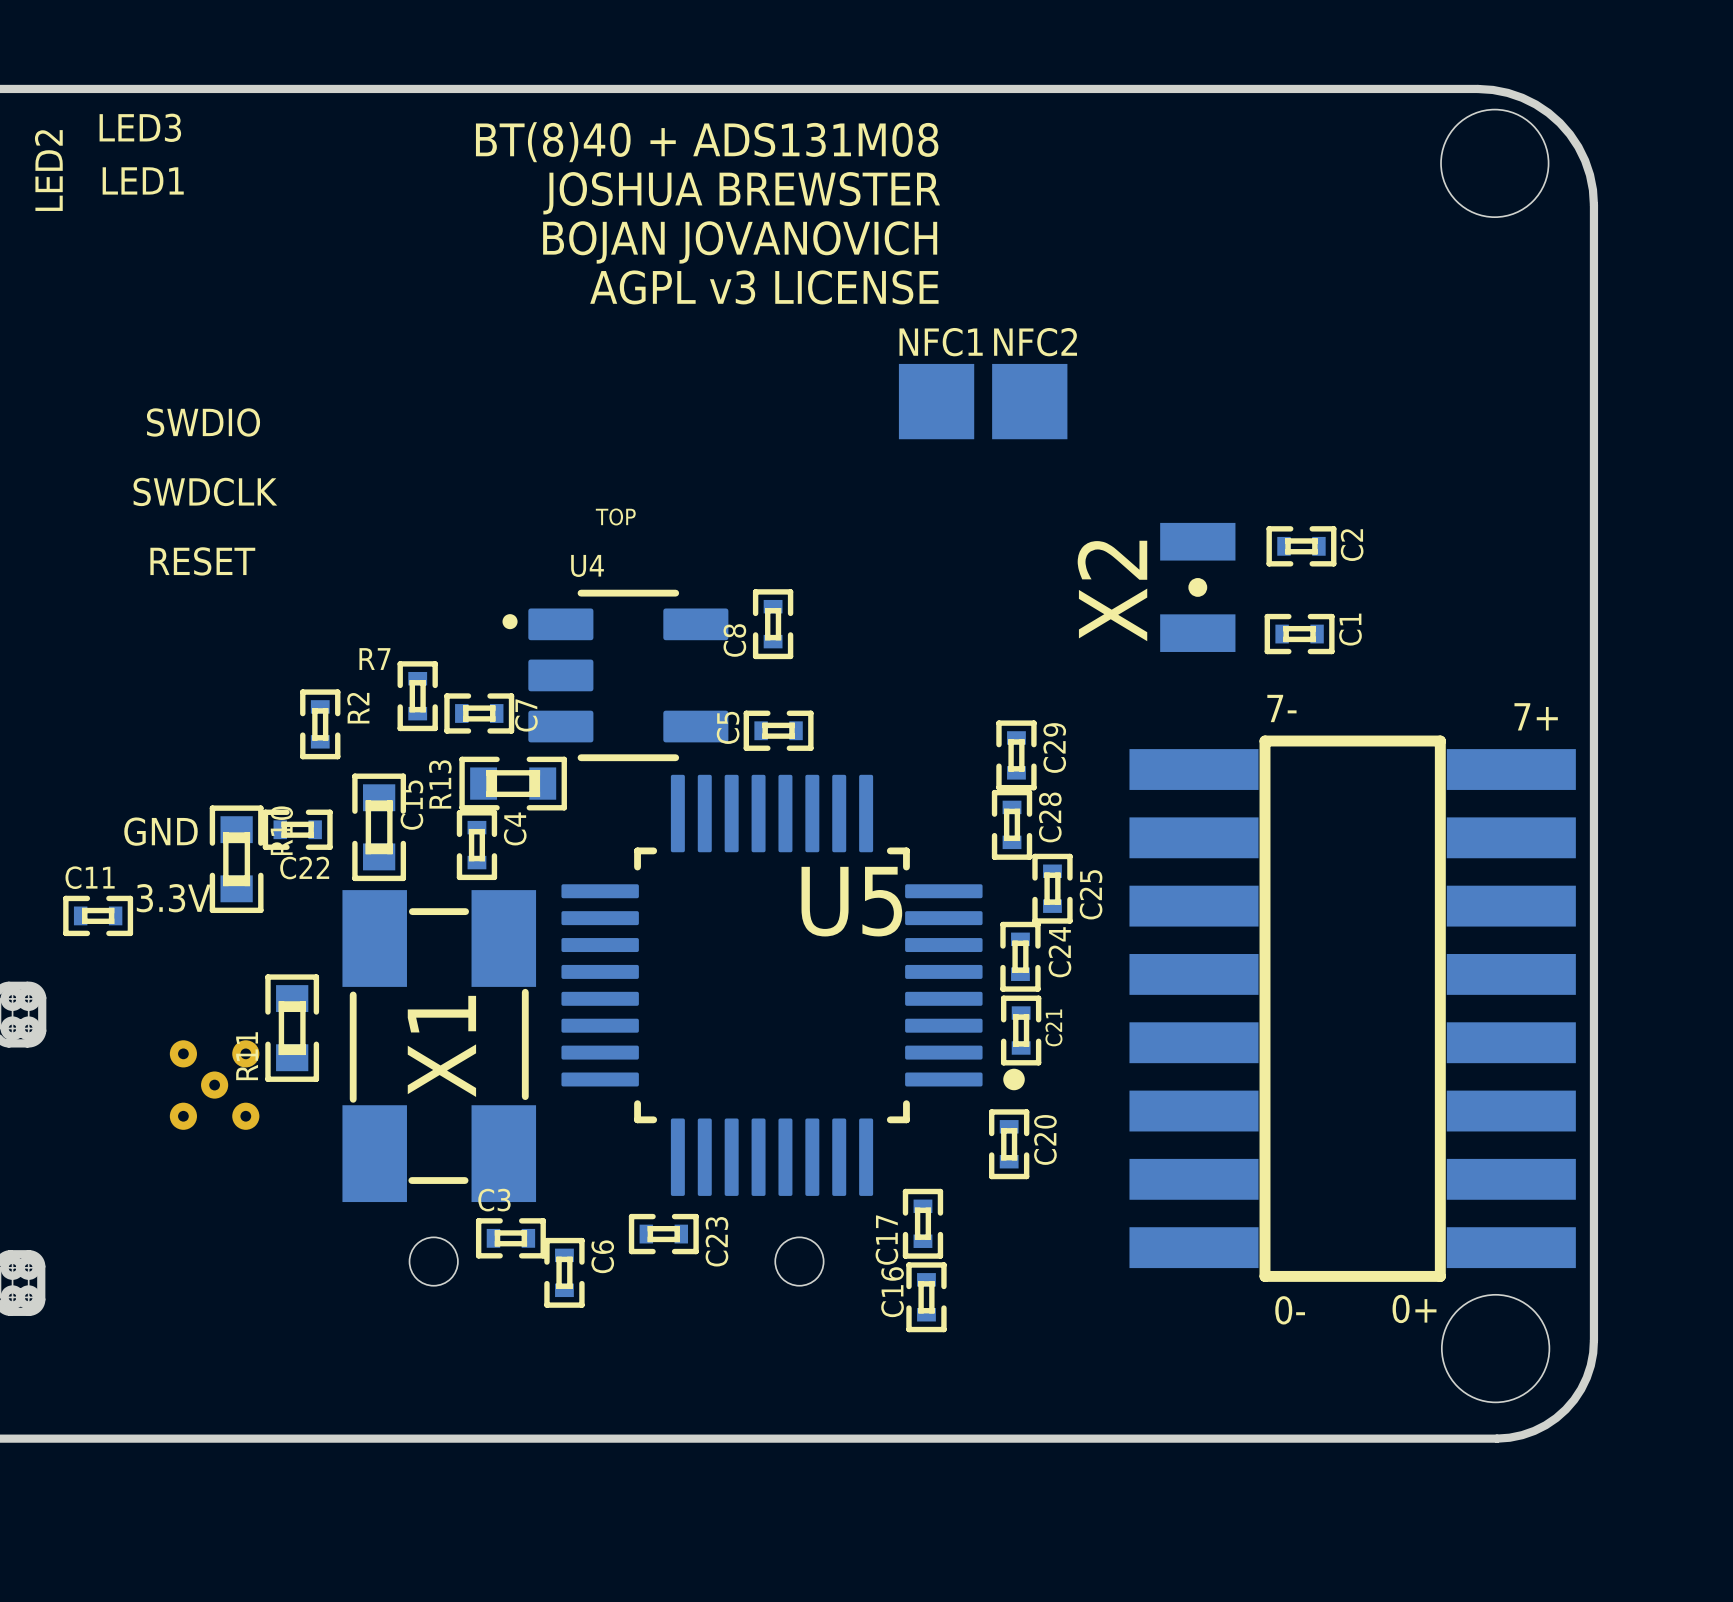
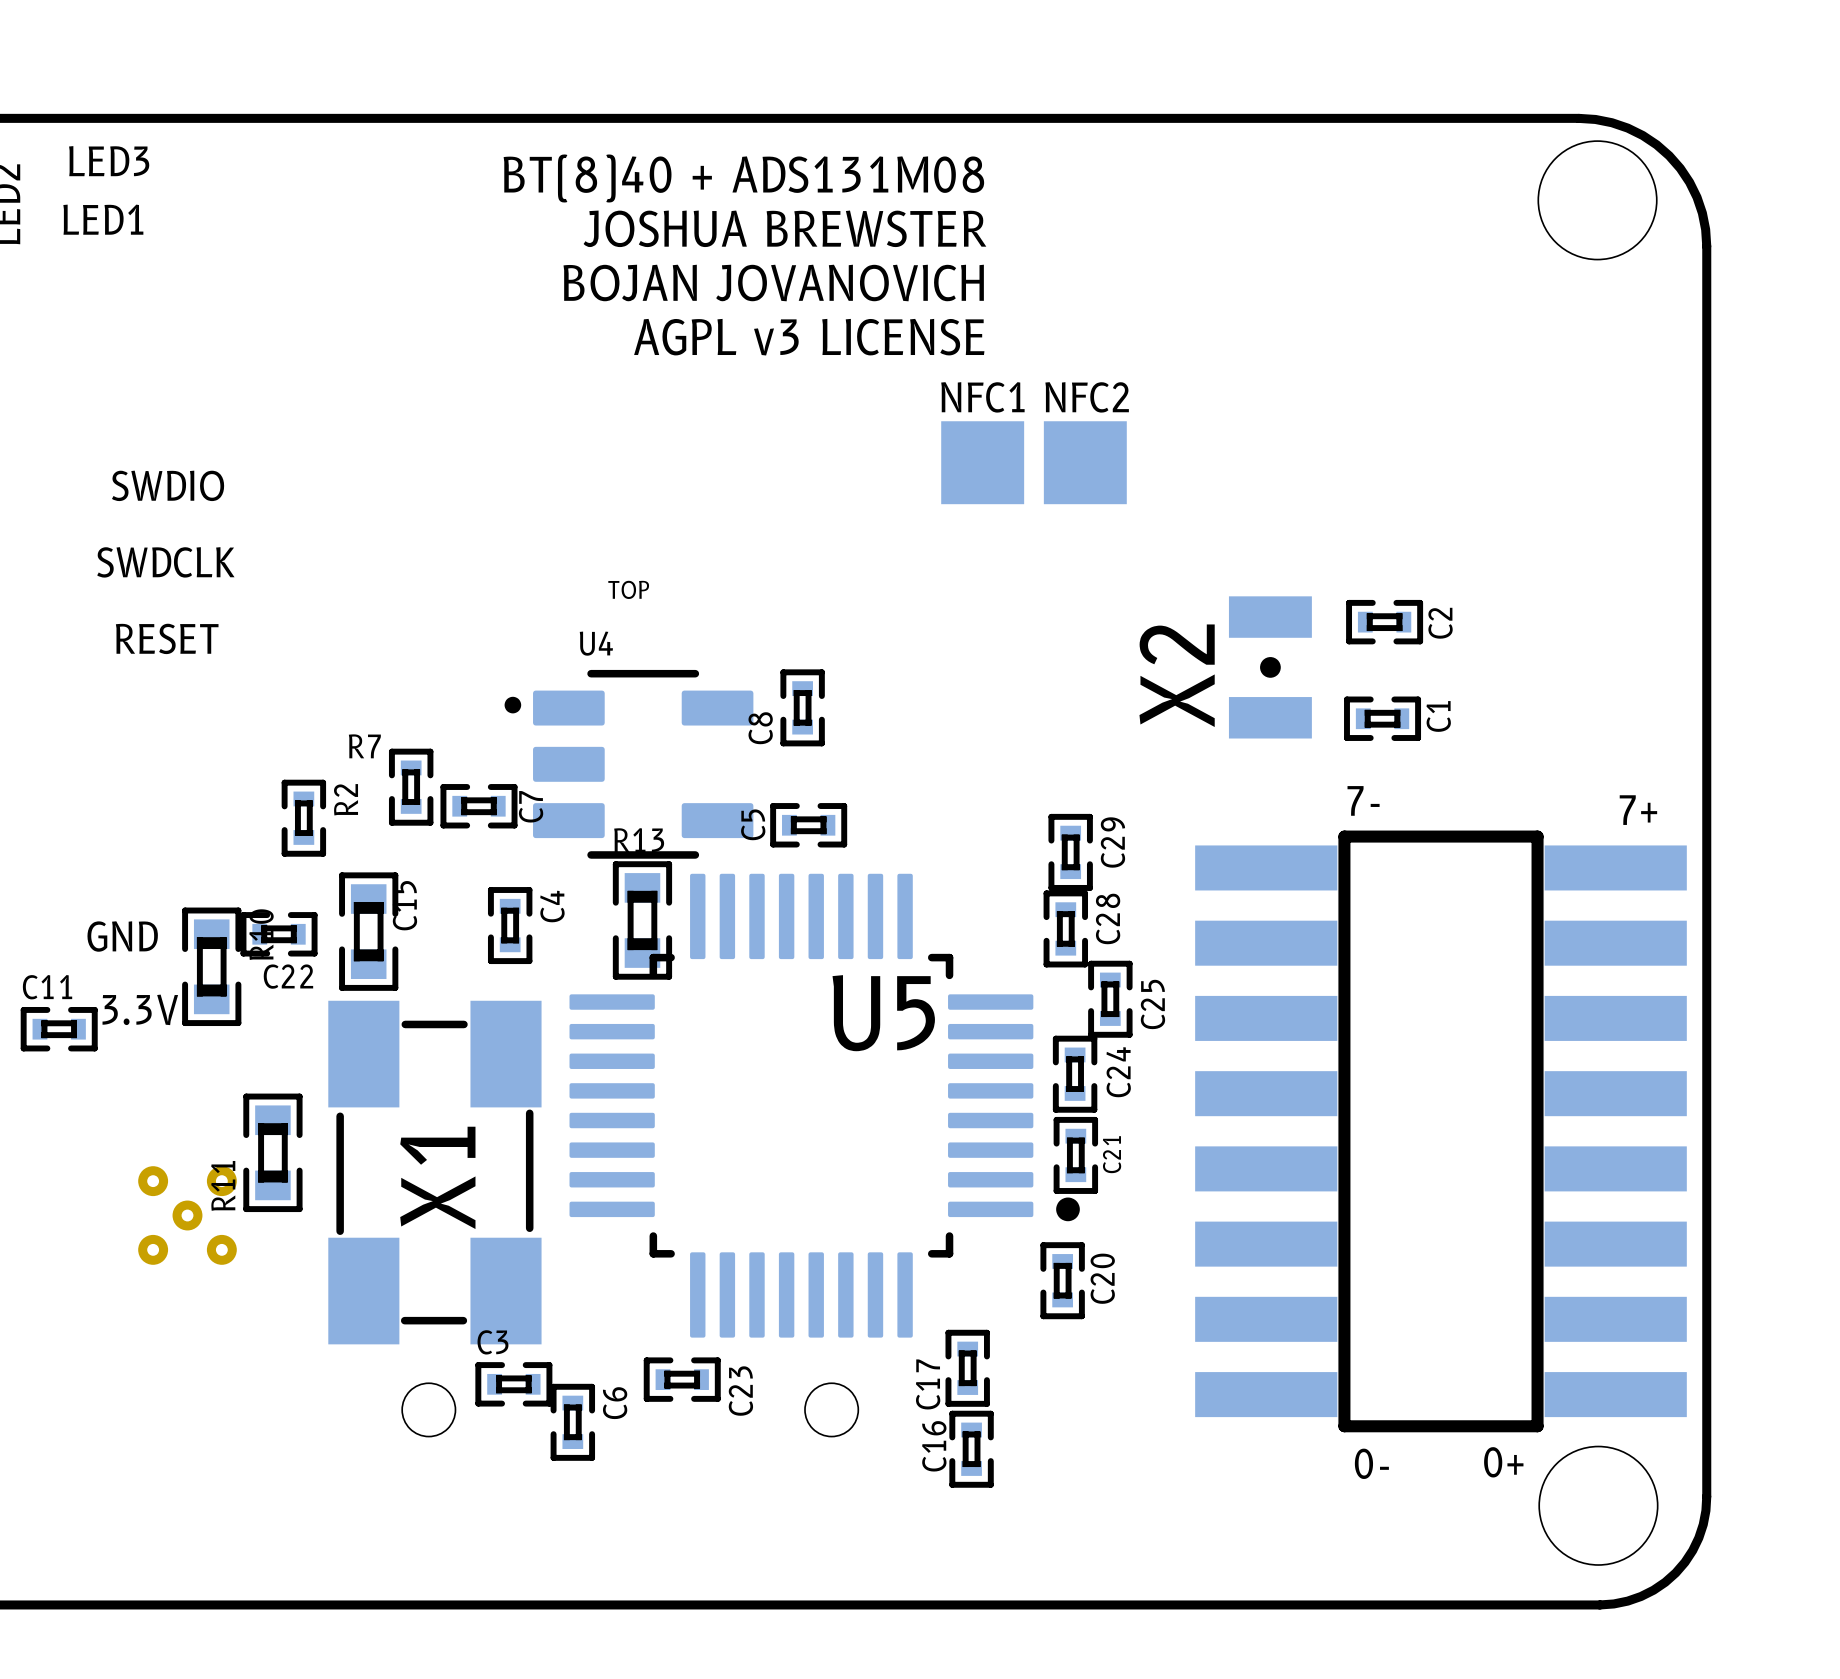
R13 rotation: 0° (513, 783) -> 90° clockwise (642, 920)
R13 position: (513, 783) -> (642, 920)
C4 position: (476, 845) -> (510, 925)

